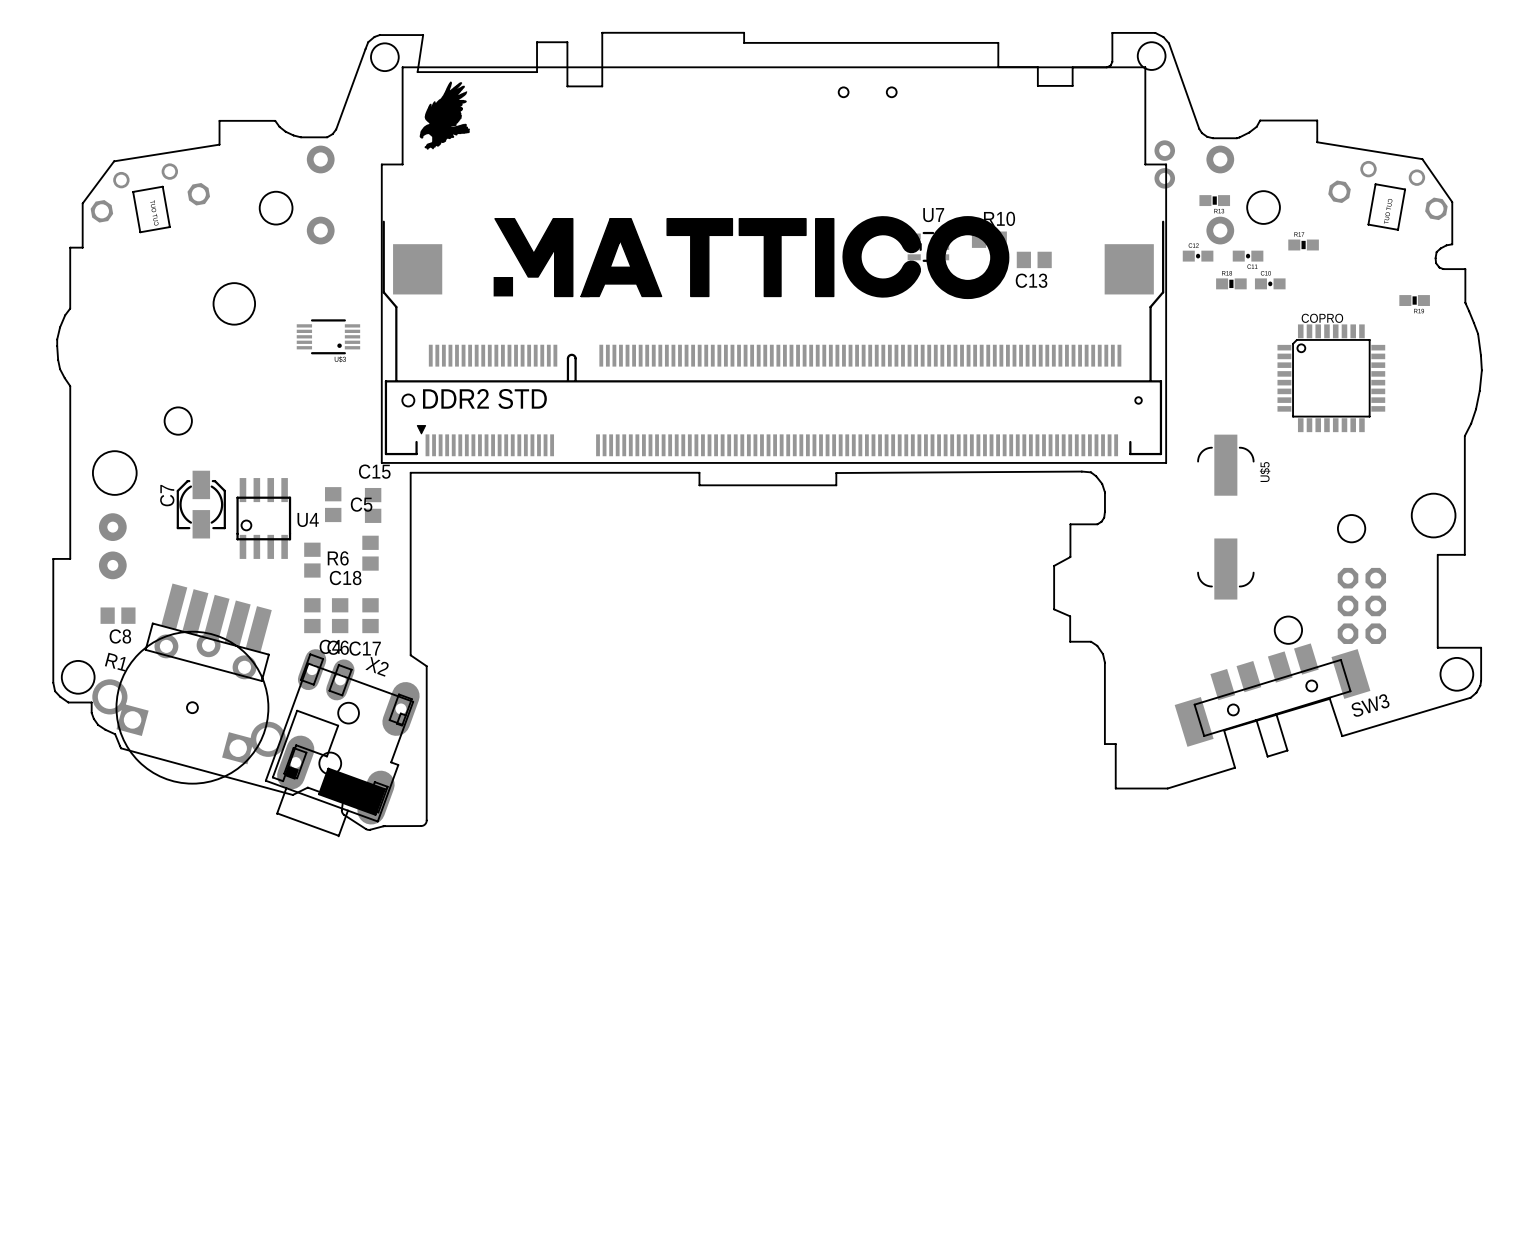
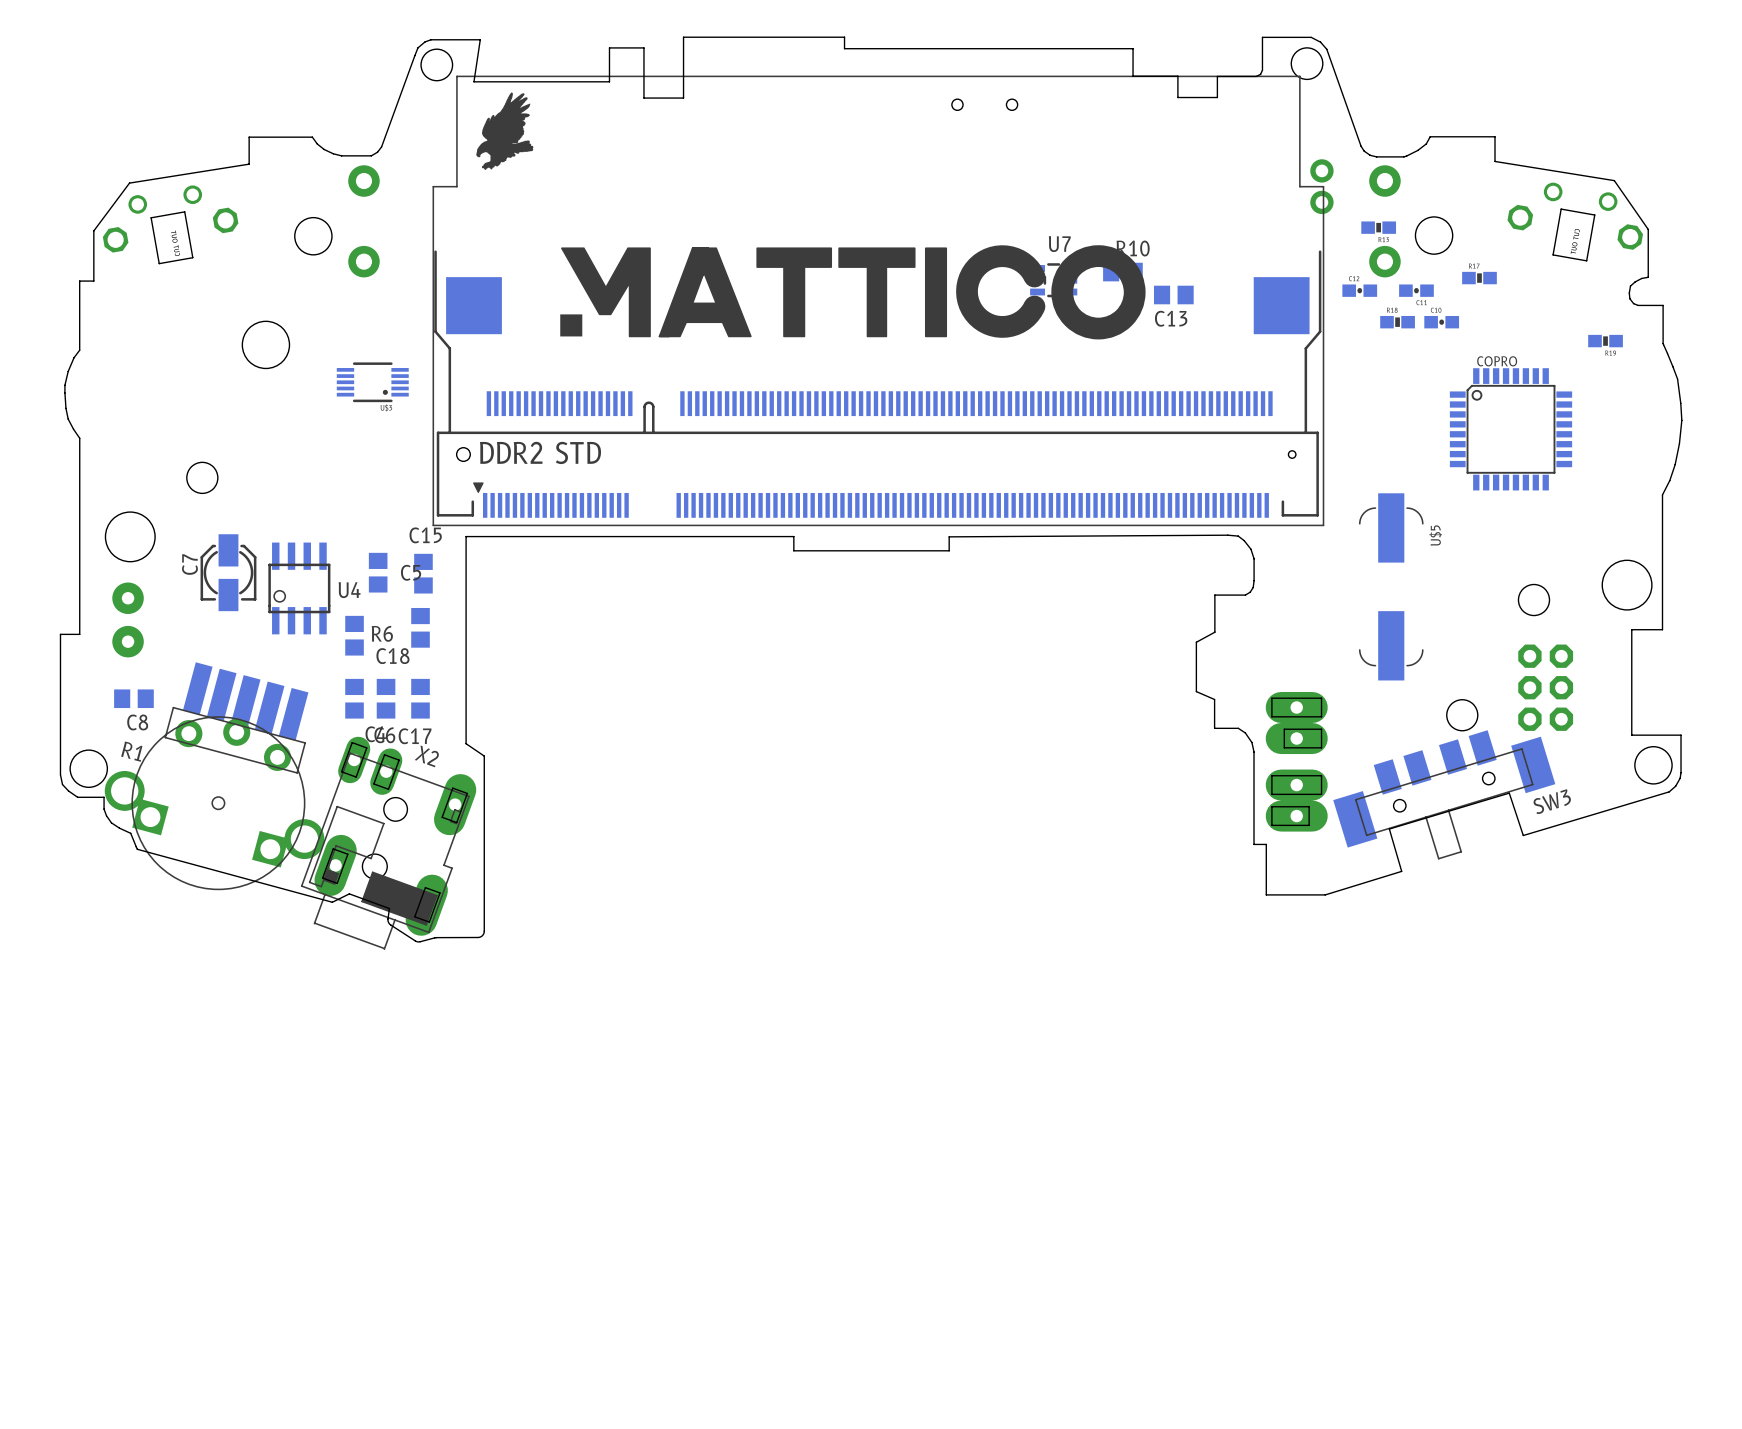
part: none -> (1296, 761)

